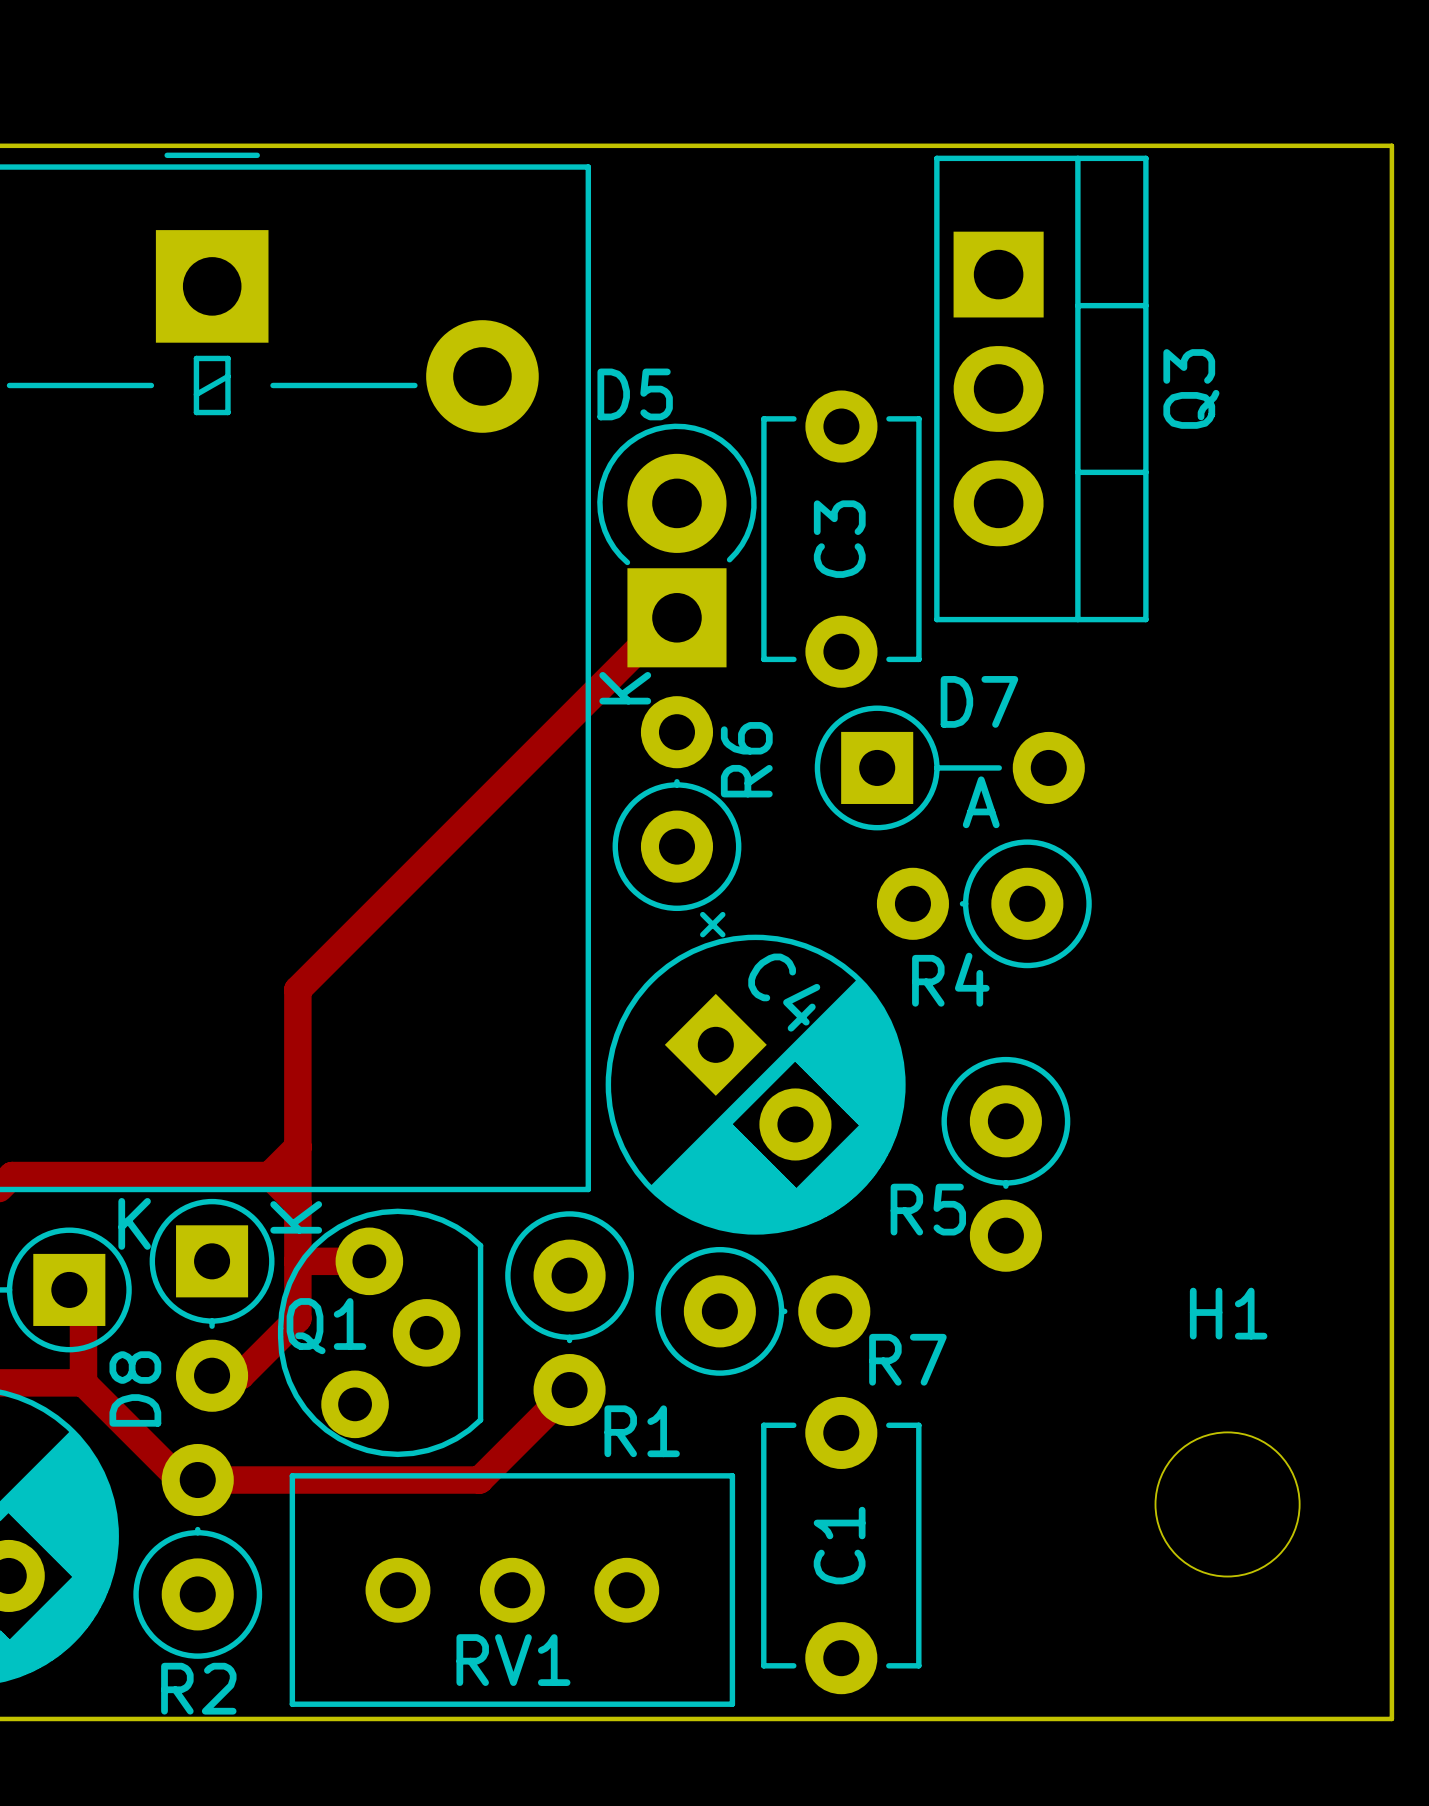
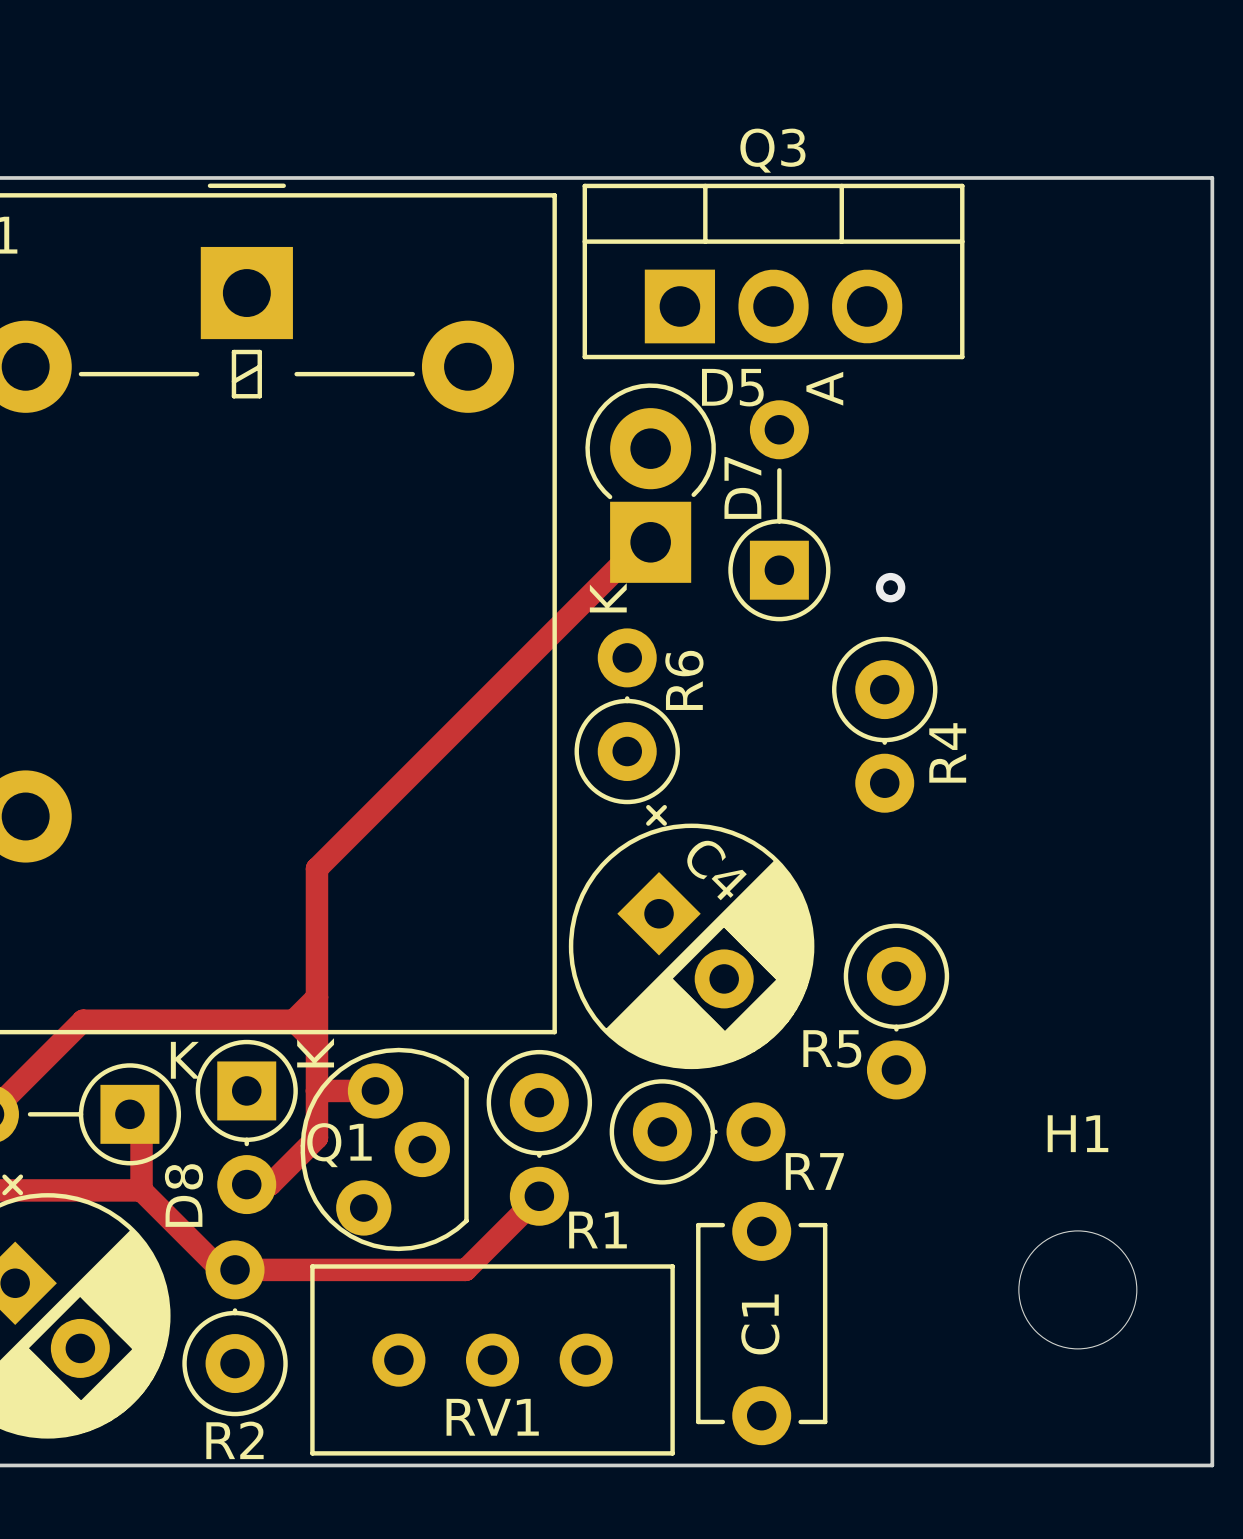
Q3 footprint: [934, 155, 1149, 623] -> [582, 183, 965, 360]
Q3 name position: Q3 (1191, 388) -> Q3 (772, 150)
D5 name position: D5 (635, 394) -> D5 (732, 387)
C3: (841, 539) -> none
D5 position: (676, 545) -> (650, 483)
via: none -> (890, 587)
D7 footprint: [814, 705, 1085, 831] -> [728, 400, 831, 622]
R4 rotation: 0° (984, 903) -> 90° counterclockwise (884, 724)

